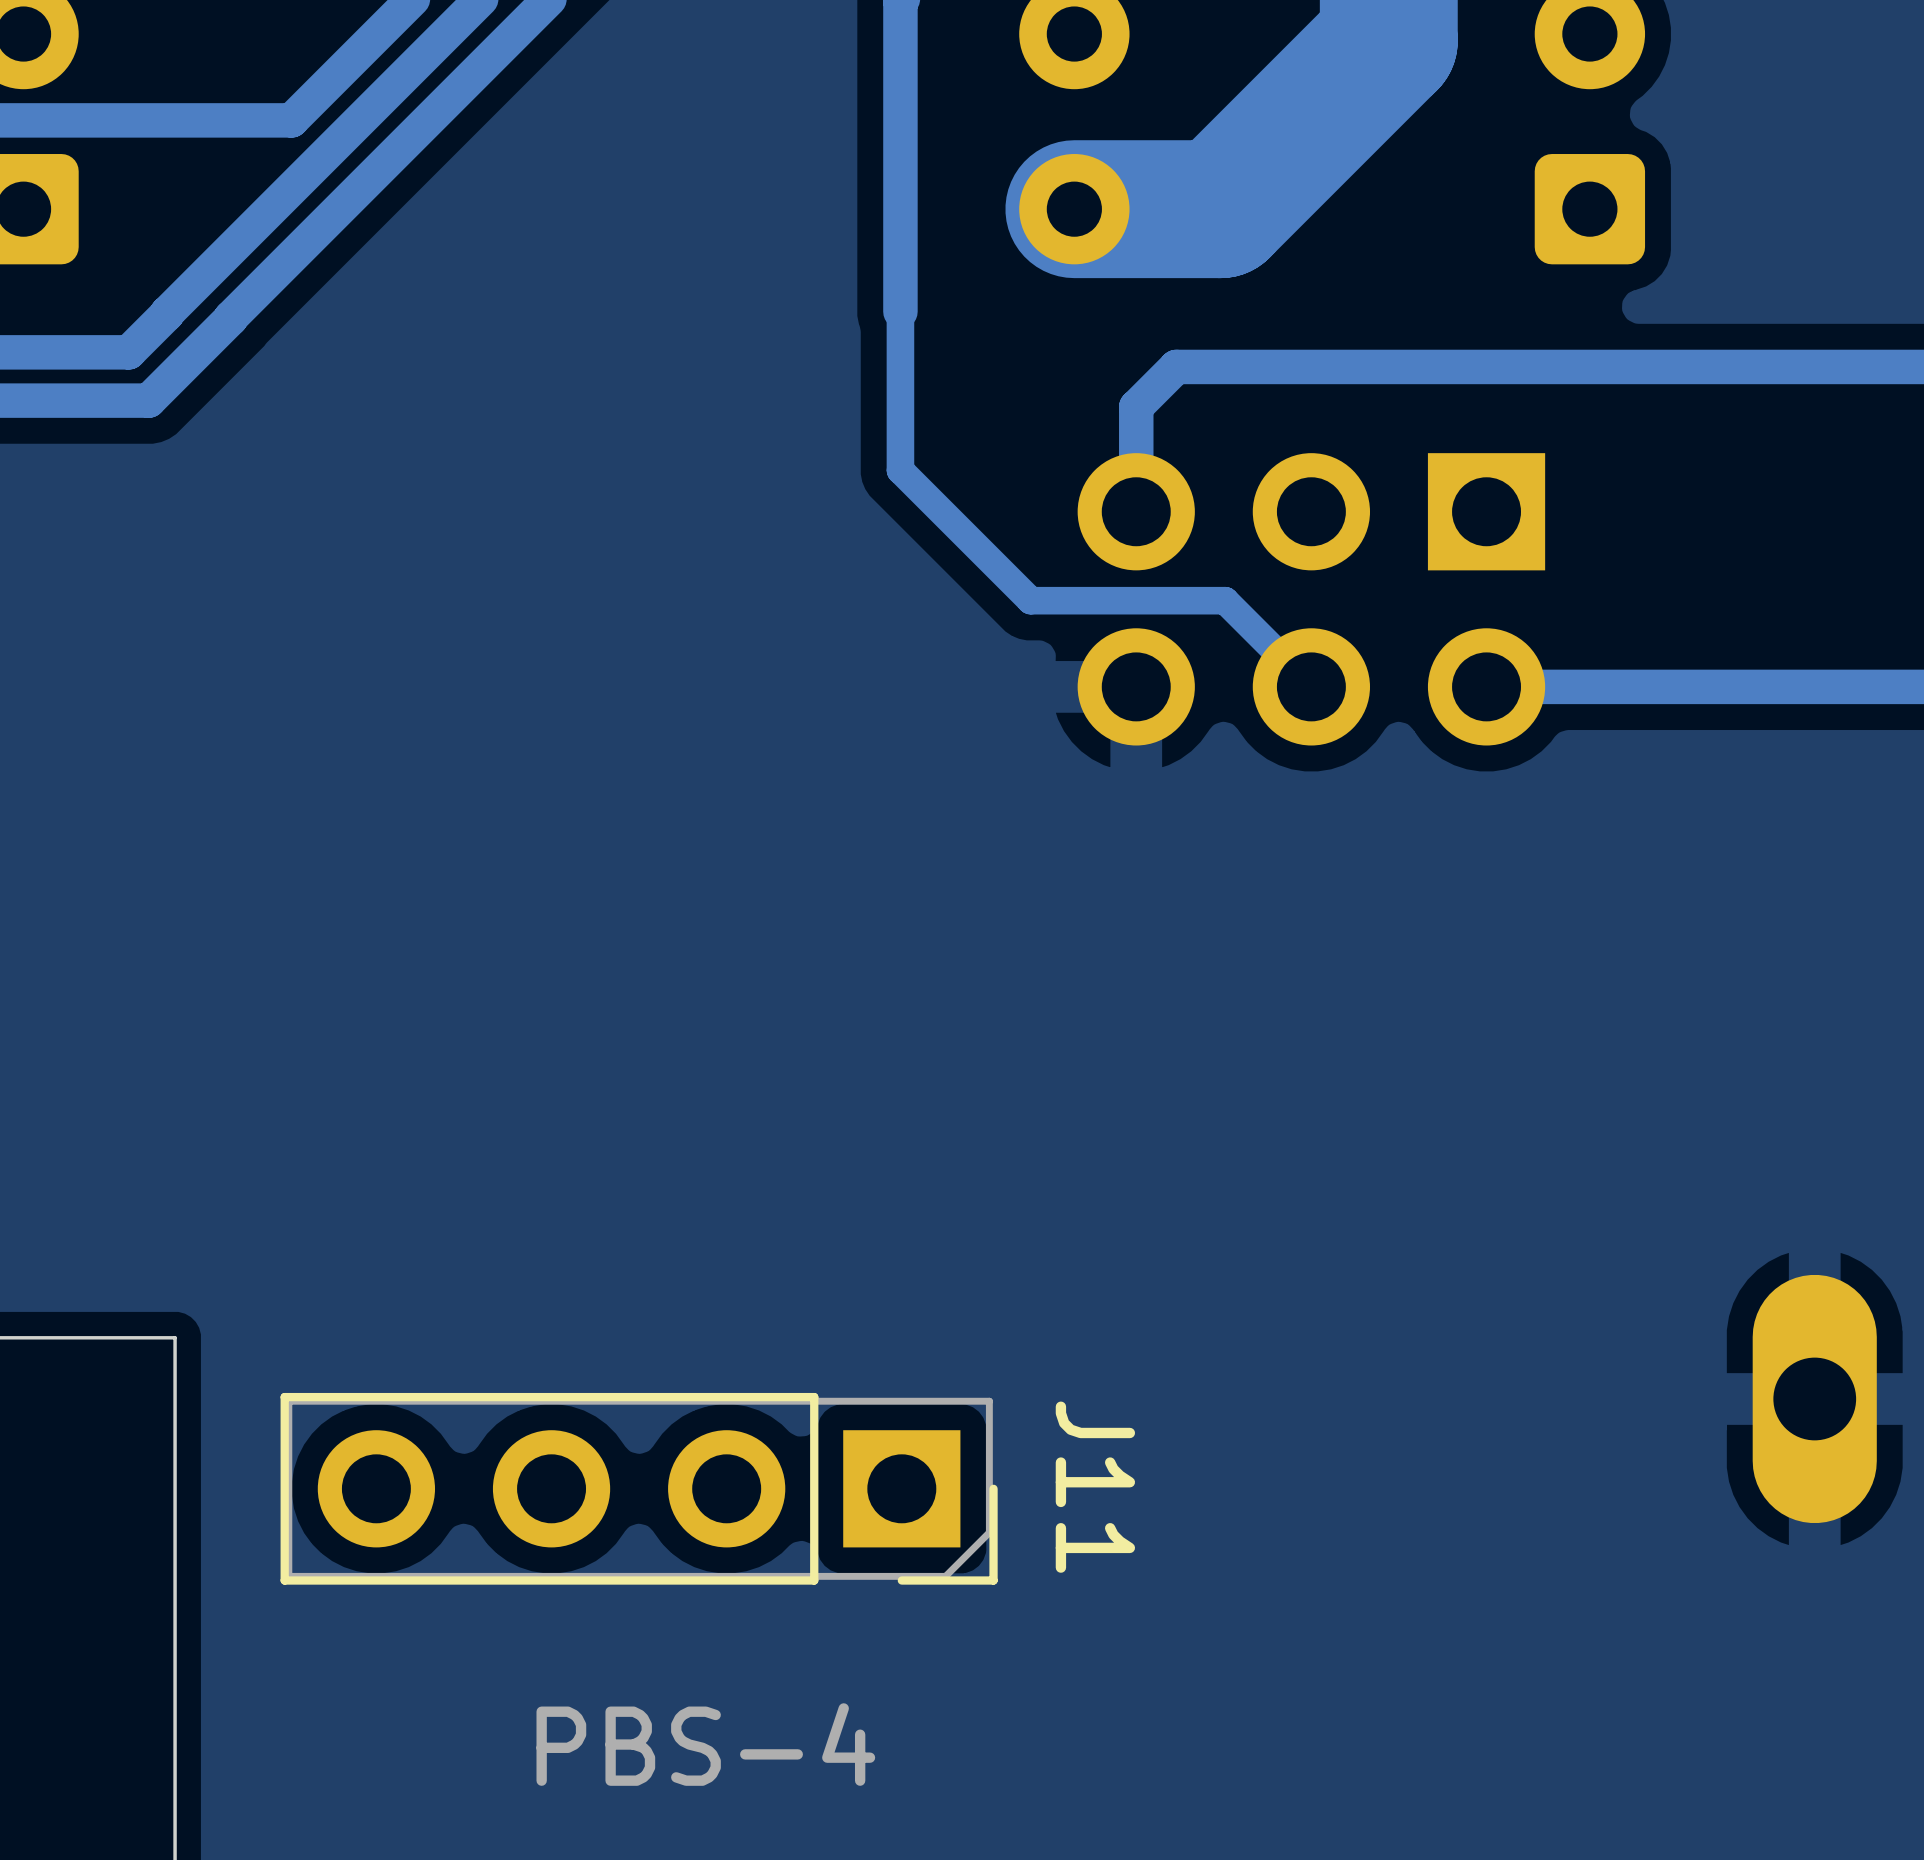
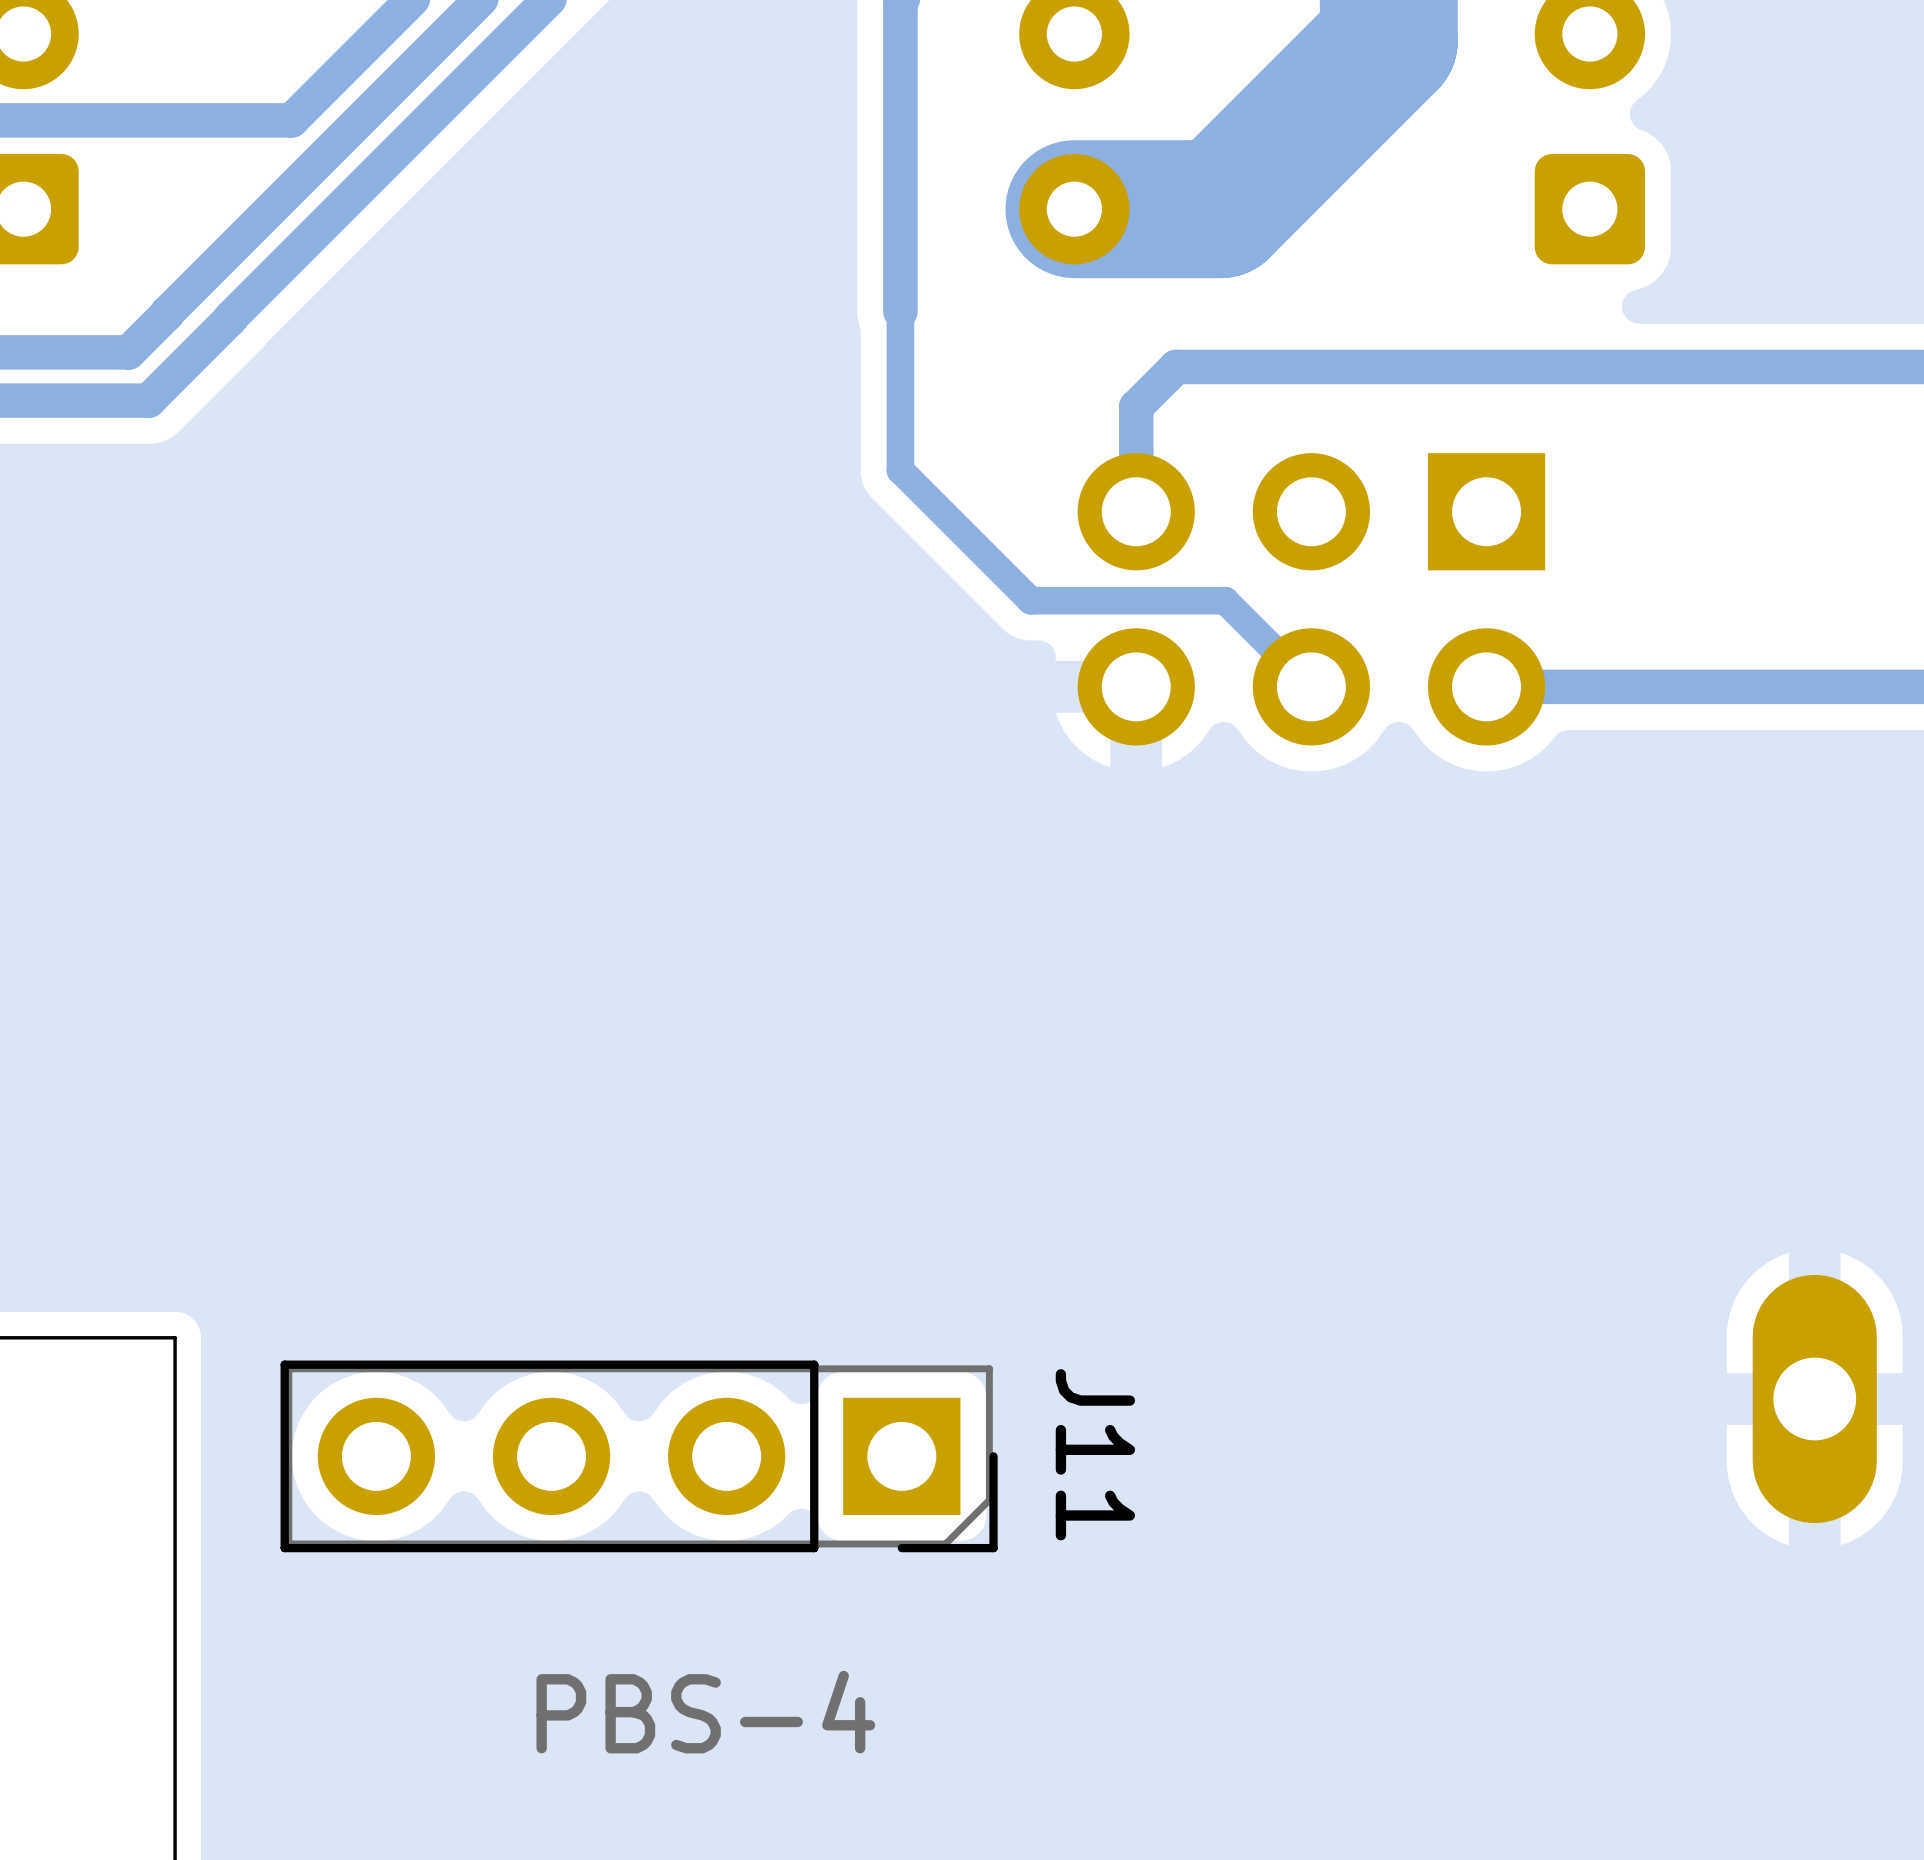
J11 position: (639, 1488) -> (639, 1456)

